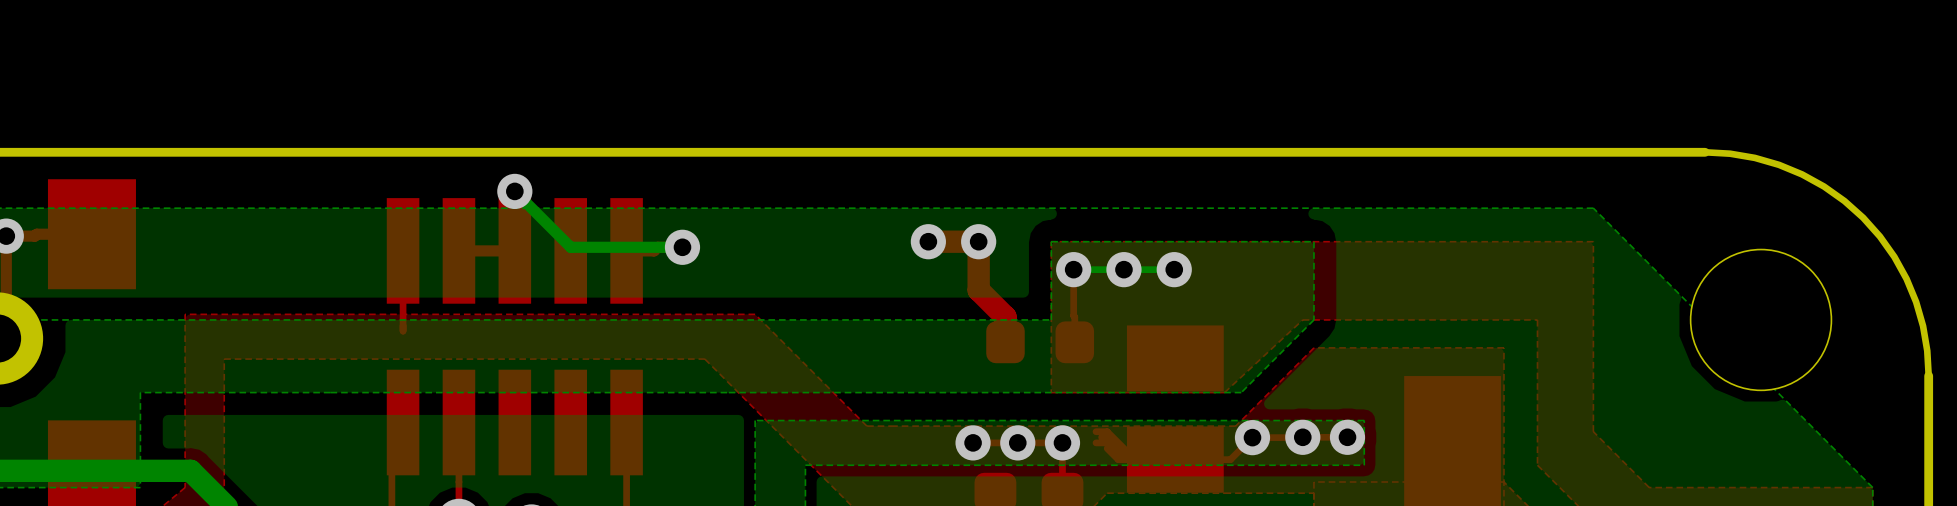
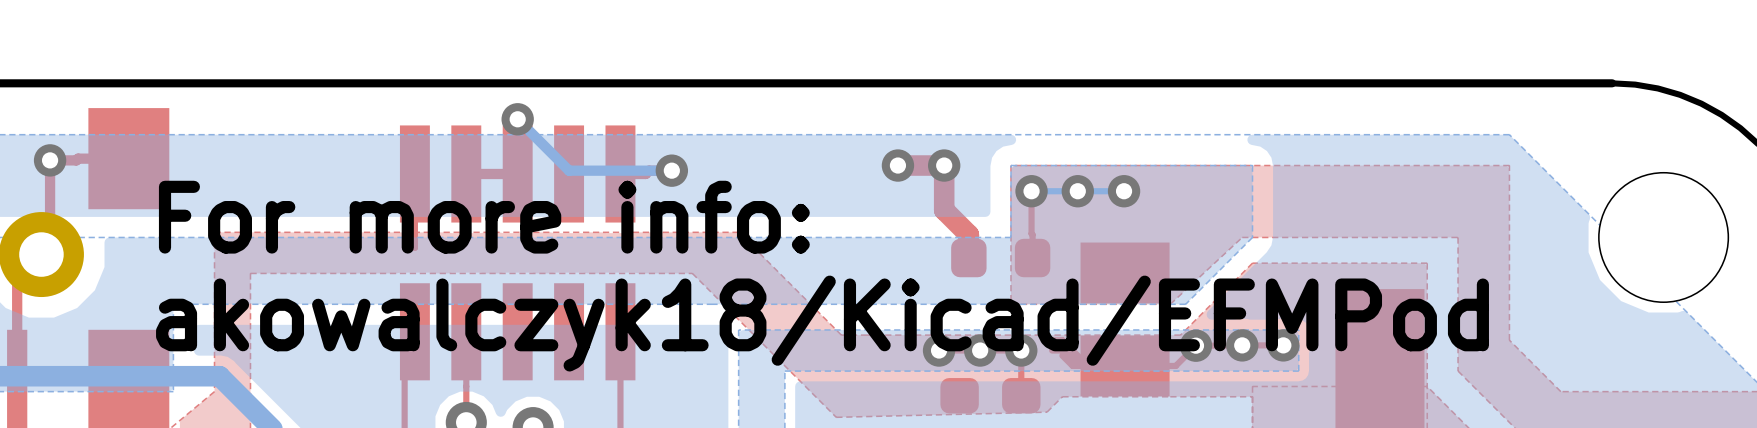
text: none -> For more info: (484, 217)
text: none -> akowalczyk18/Kicad/EFMPod (822, 323)

